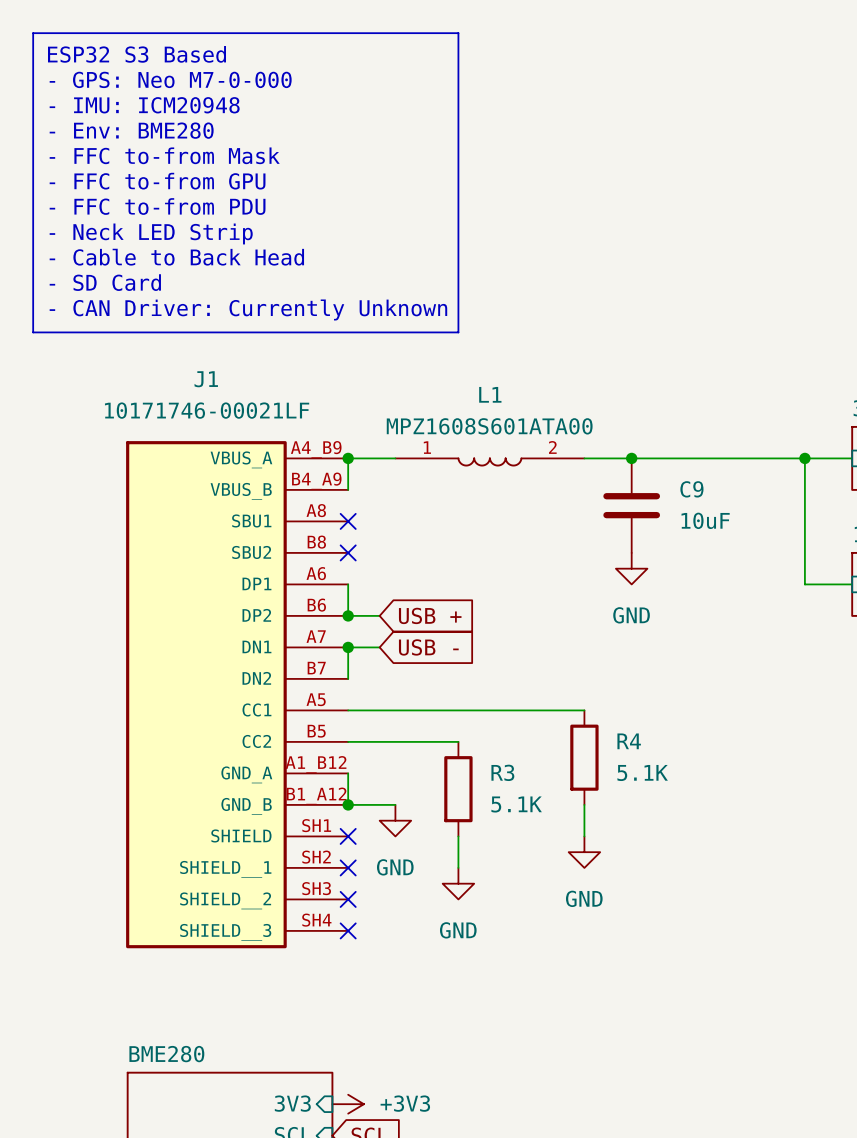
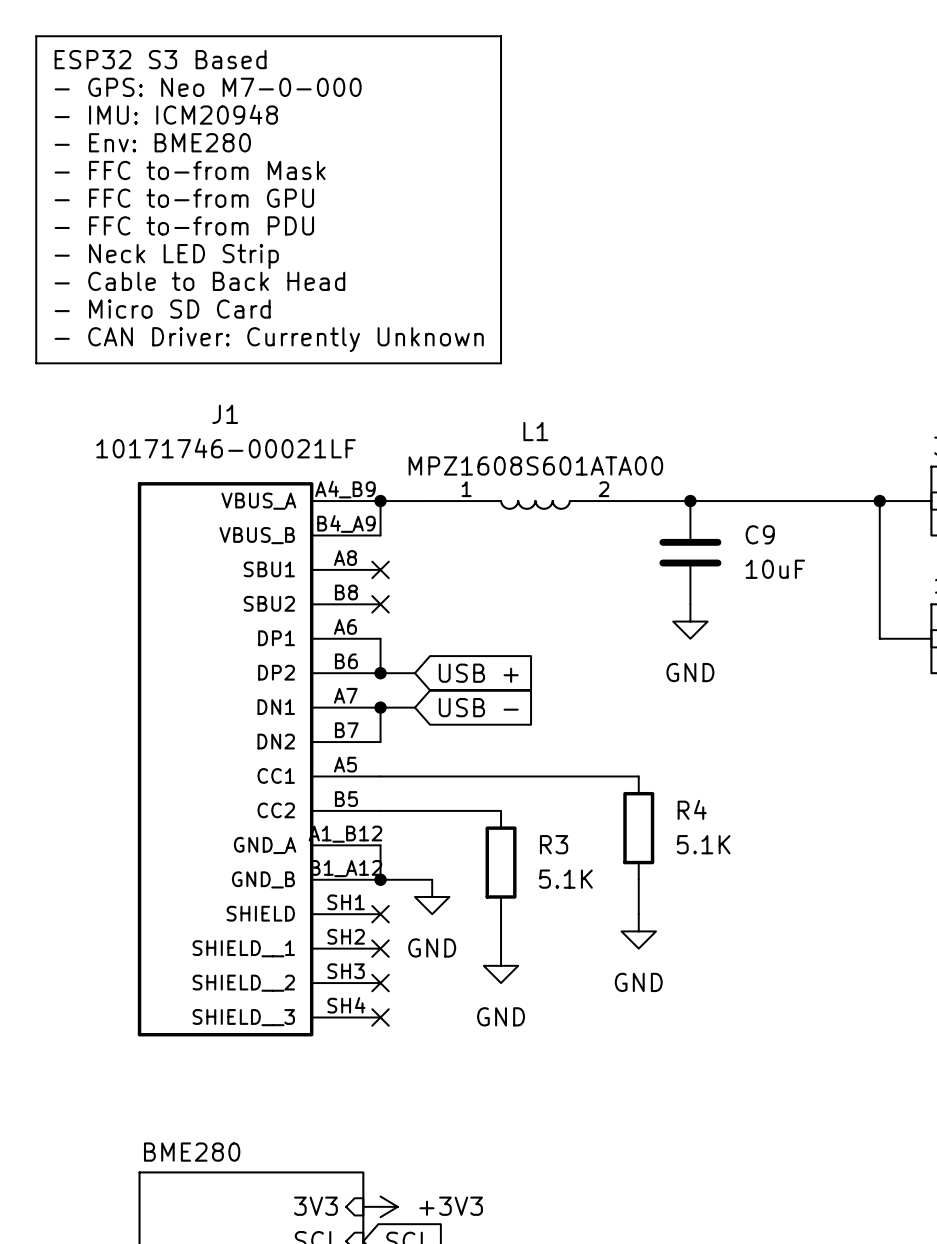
text: - SD Card (105, 282) -> - Micro SD Card (162, 309)

